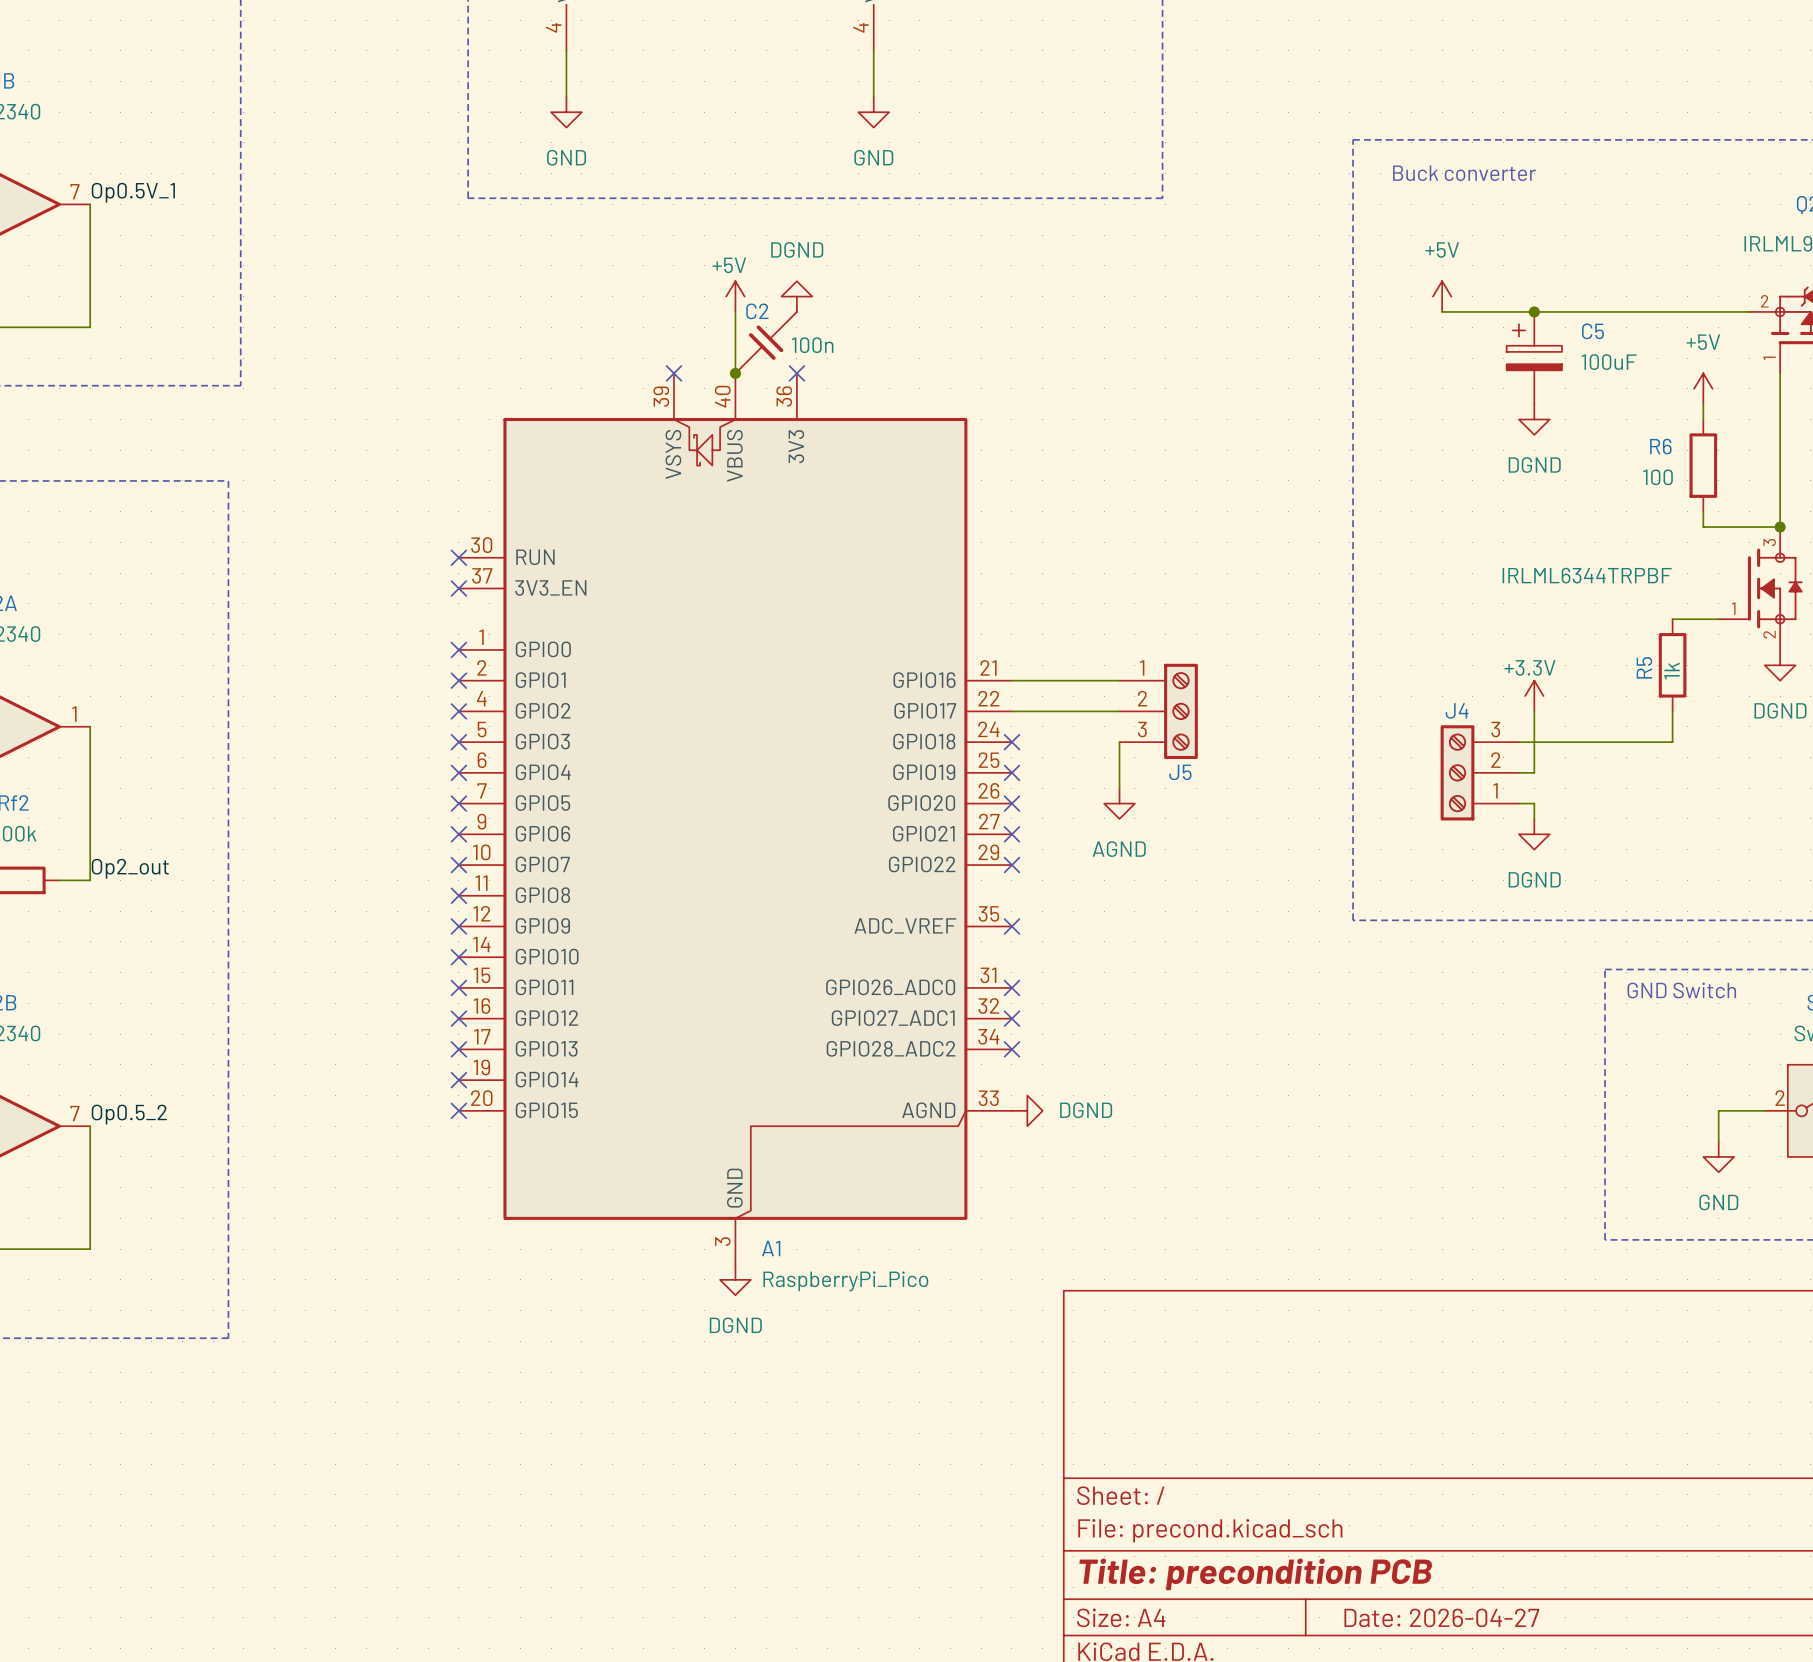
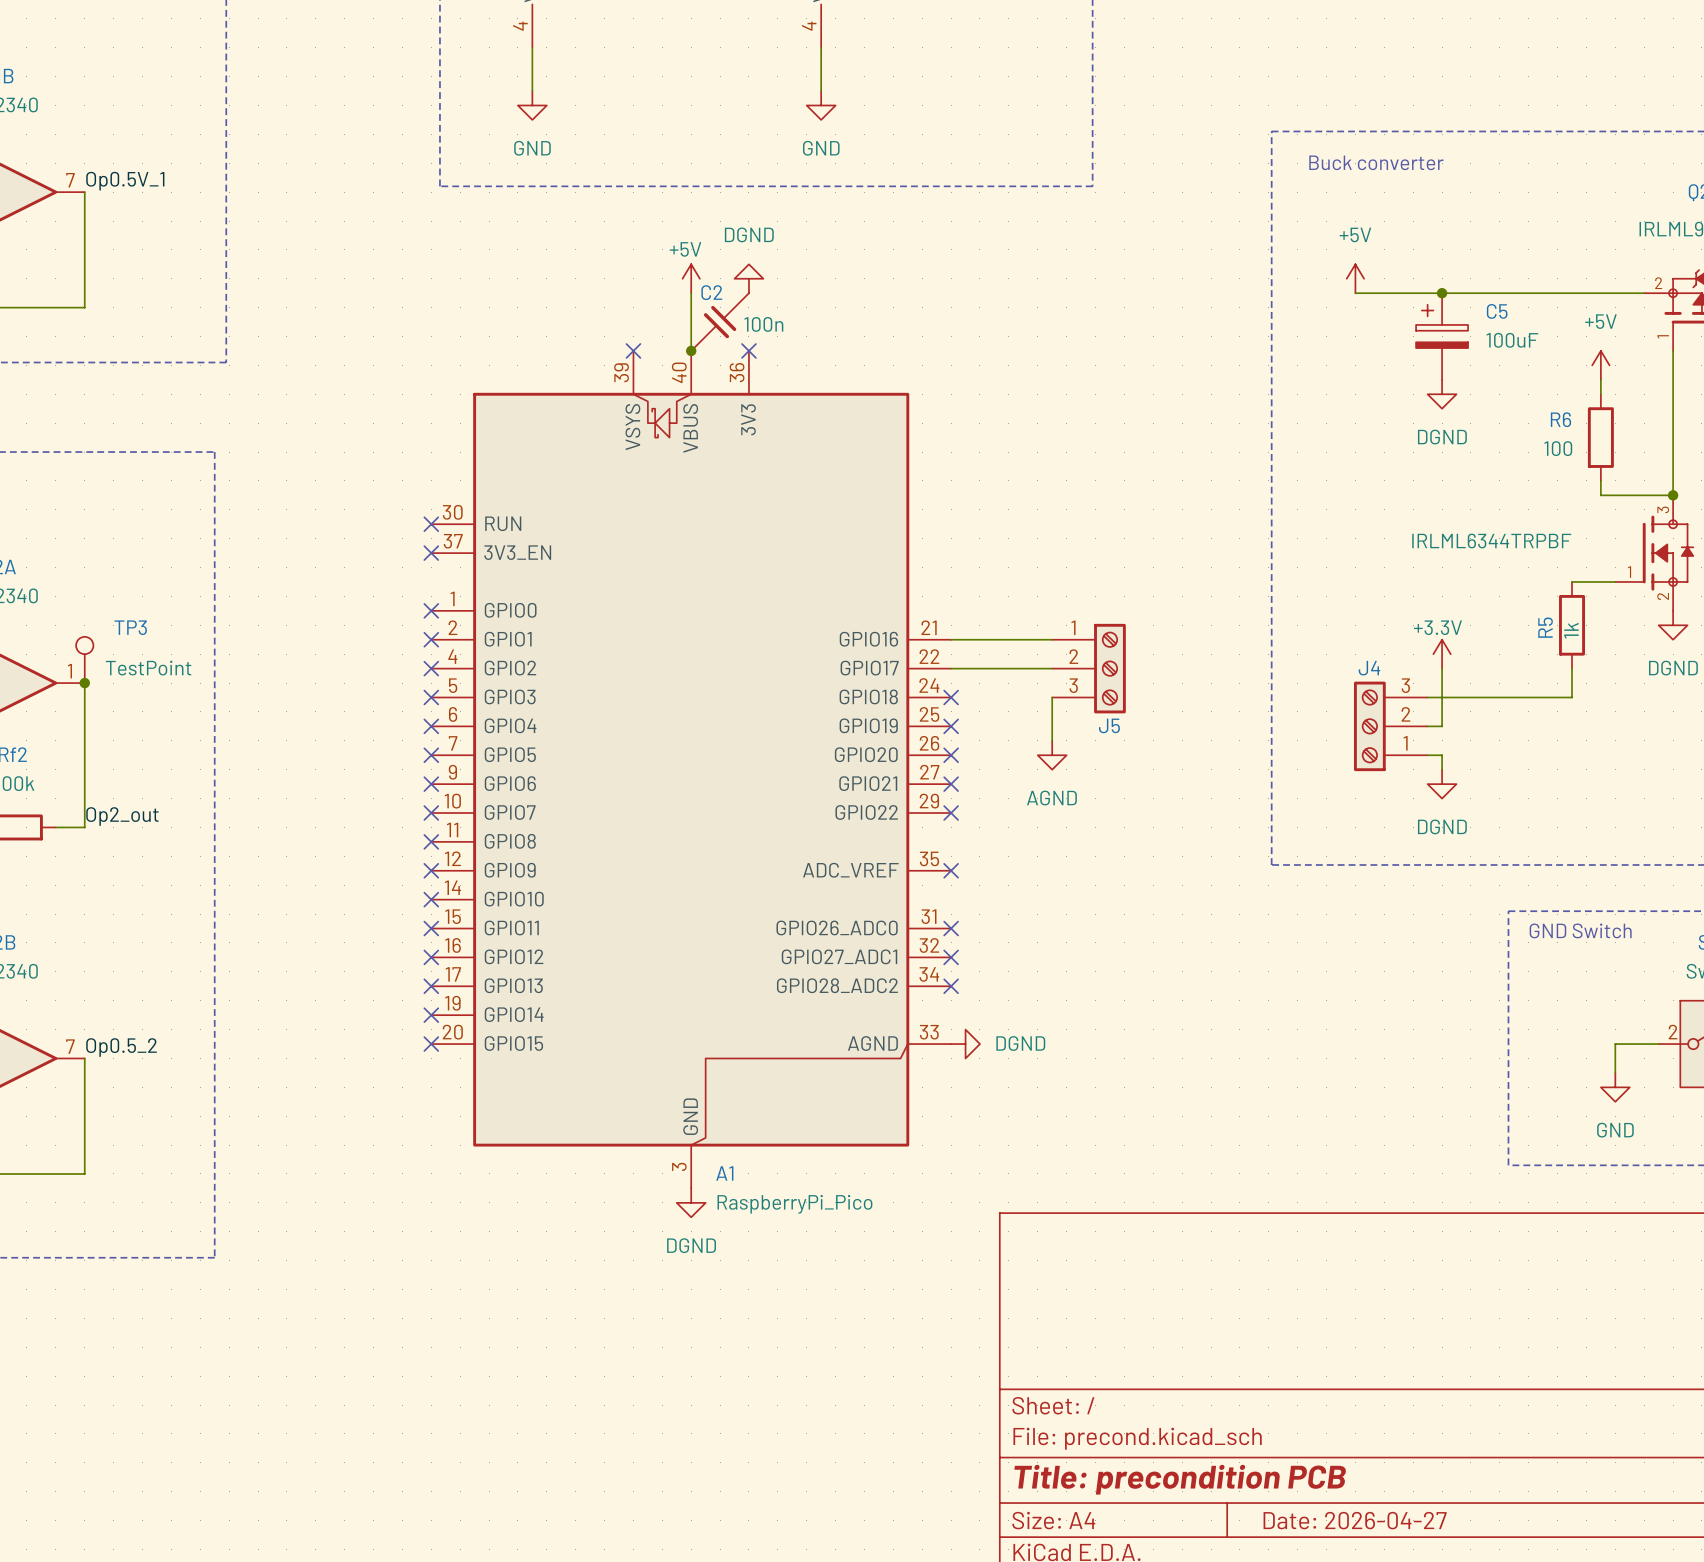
TP3: none -> TestPoint (84, 659)
junction: none -> (84, 683)

